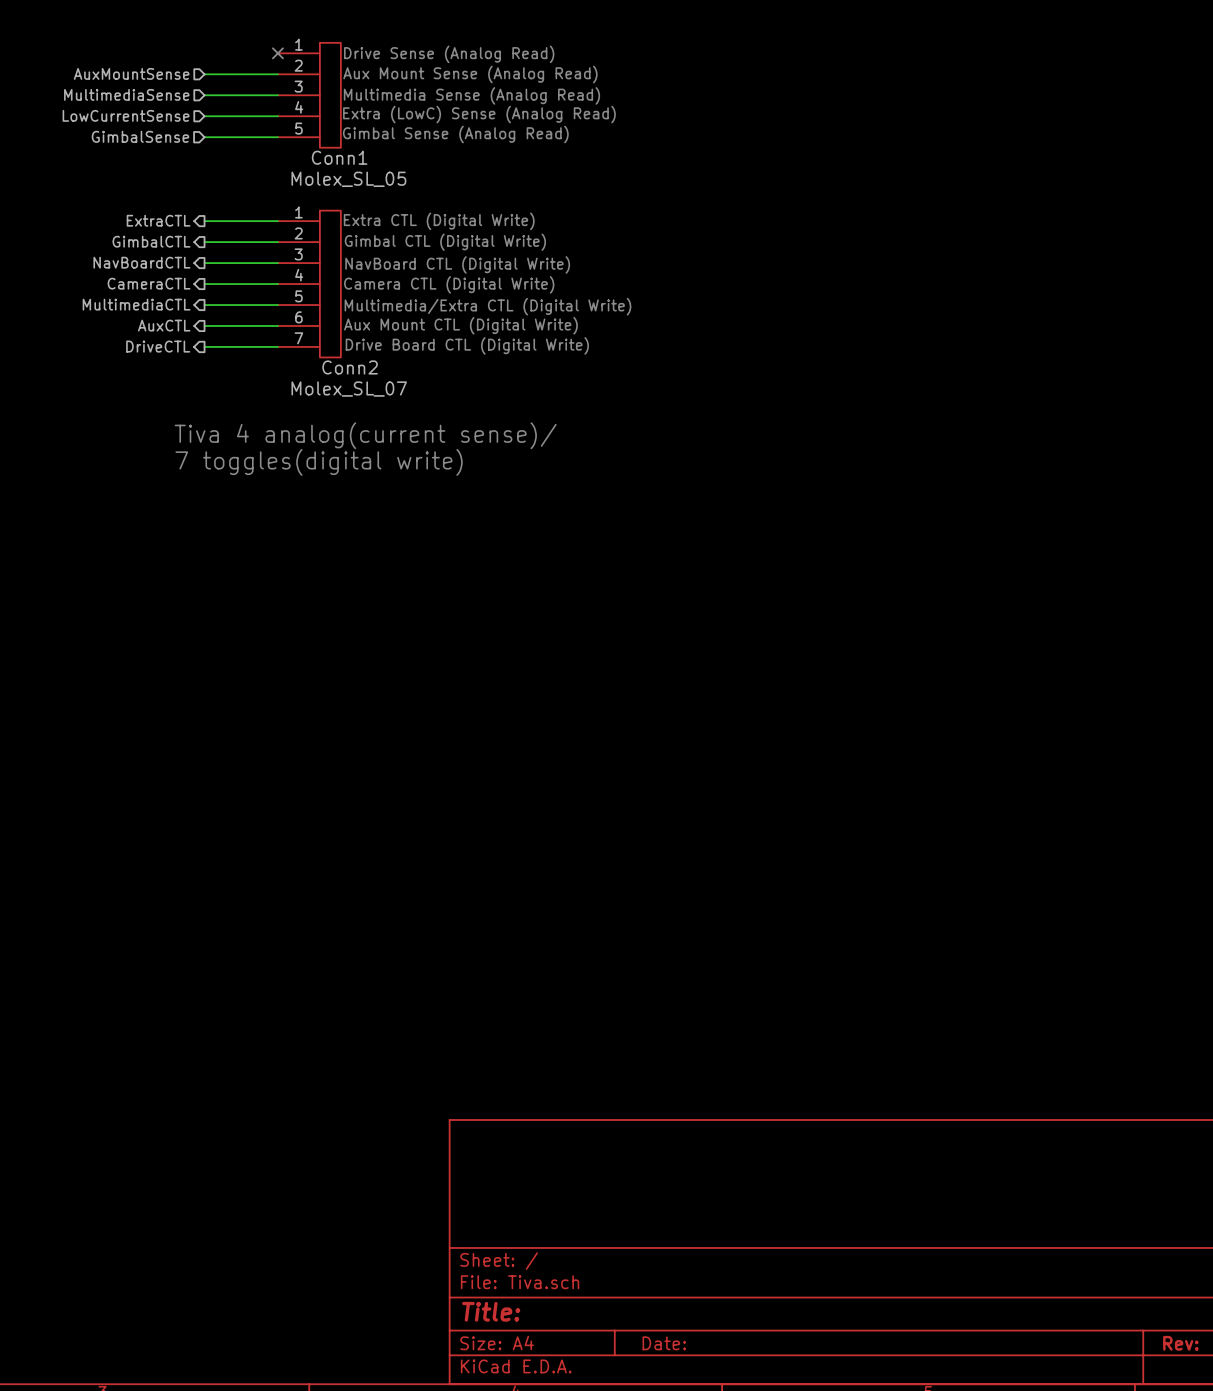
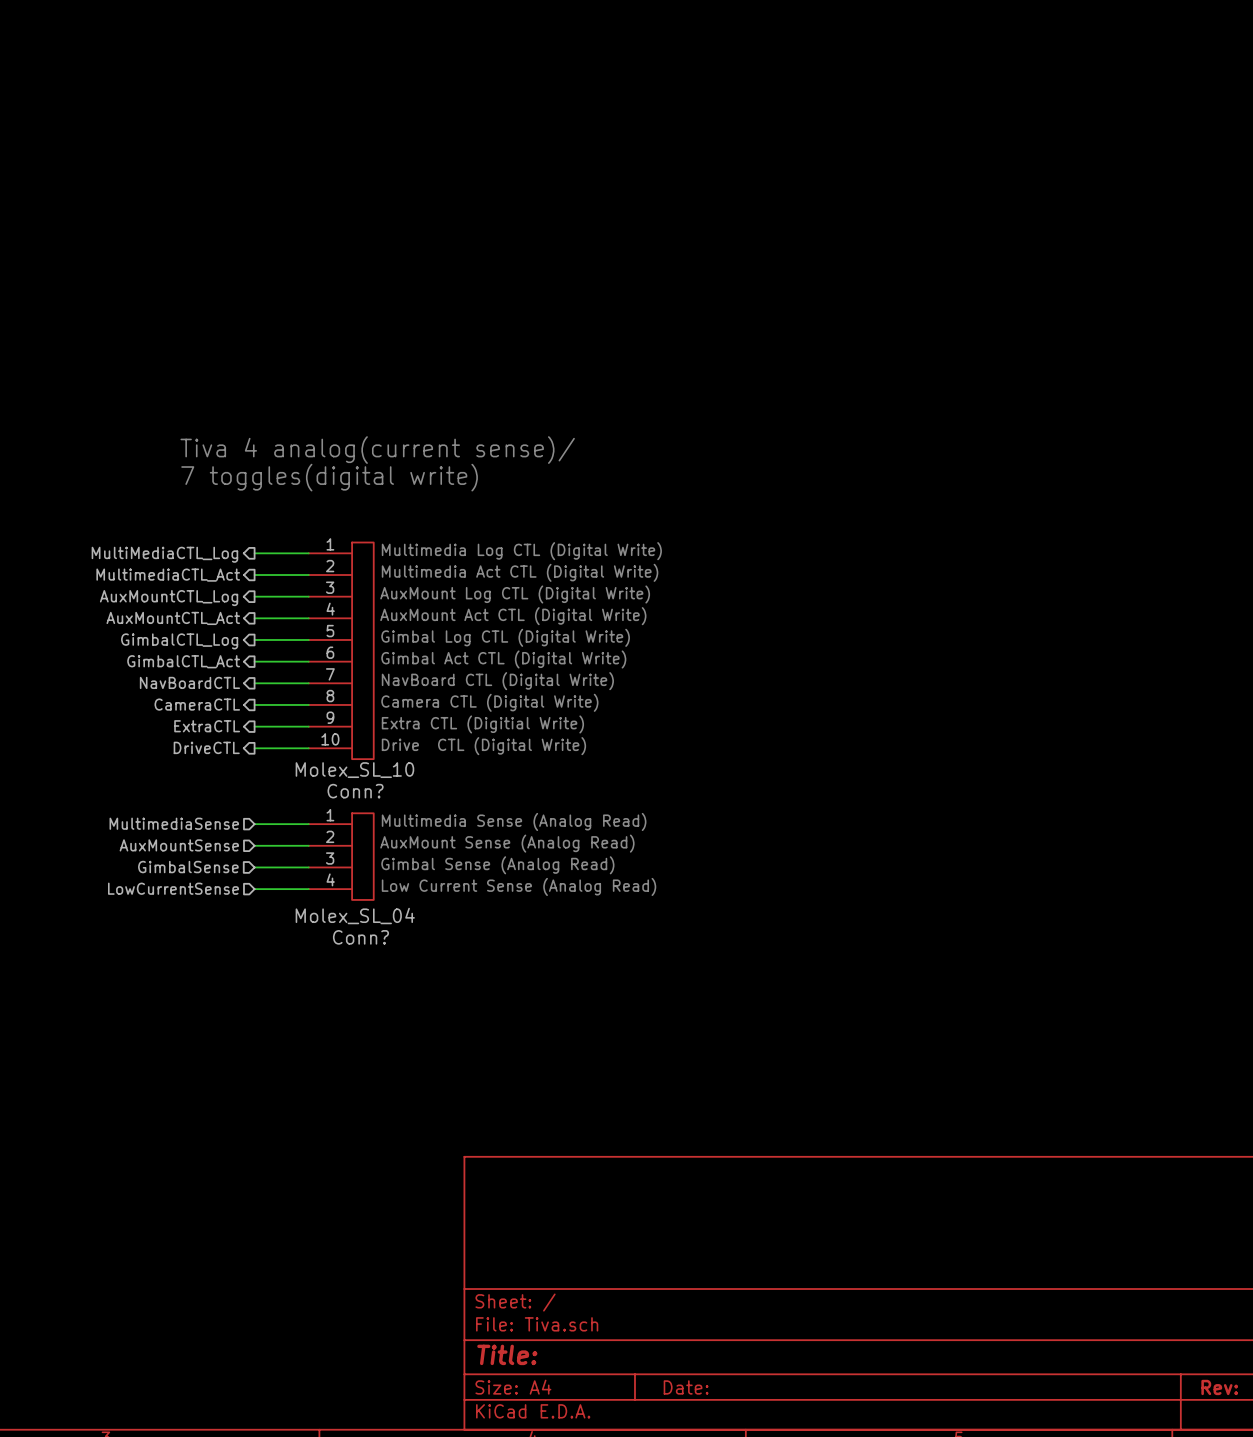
no-connect mark: (277, 53) -> none
text: Drive Sense (Analog Read) (449, 54) -> none
hierarchical label: AuxMountSense (131, 73) -> none
wire: (204, 74) (277, 74) -> none
text: Aux Mount Sense (Analog Read) (470, 74) -> none
hierarchical label: MultimediaSense (126, 94) -> none
wire: (204, 95) (277, 95) -> none
Conn1: Molex_SL_05 (309, 95) -> none
text: Multimedia Sense (Analog Read) (471, 95) -> none
text: Extra (LowC) Sense (Analog Read) (479, 114) -> none
hierarchical label: LowCurrentSense (126, 115) -> none
wire: (204, 116) (277, 116) -> none
text: Gimbal Sense (Analog Read) (455, 134) -> none
hierarchical label: GimbalSense (140, 136) -> none
wire: (204, 137) (277, 137) -> none
hierarchical label: ExtraCTL (158, 220) -> none
wire: (204, 221) (277, 221) -> none
text: Extra CTL (Digital Write) (439, 221) -> none
hierarchical label: GimbalCTL (151, 241) -> none
wire: (204, 242) (277, 242) -> none
text: Gimbal CTL (Digital Write) (445, 242) -> none
hierarchical label: NavBoardCTL (141, 262) -> none
wire: (204, 263) (277, 263) -> none
text: NavBoard CTL (Digital Write) (457, 264) -> none
hierarchical label: CameraCTL (149, 283) -> none
wire: (204, 284) (277, 284) -> none
Conn2: Molex_SL_07 (309, 284) -> none
text: Camera CTL (Digital Write) (449, 284) -> none
hierarchical label: MultimediaCTL (136, 304) -> none
wire: (204, 305) (277, 305) -> none
text: Multimedia/Extra CTL (Digital Write) (487, 306) -> none
hierarchical label: AuxCTL (164, 325) -> none
wire: (204, 325) (277, 325) -> none
text: Aux Mount CTL (Digital Write) (460, 325) -> none
text: Drive Board CTL (Digital Write) (467, 345) -> none
hierarchical label: DriveCTL (158, 346) -> none
wire: (204, 346) (277, 346) -> none
text: none -> Multimedia Log CTL (Digital Write) (521, 551)
wire: none -> (254, 553) (308, 553)
hierarchical label: none -> MultiMediaCTL_Log (164, 554)
text: none -> Multimedia Act CTL (Digital Write) (520, 572)
hierarchical label: none -> MultimediaCTL_Act (168, 575)
wire: none -> (254, 575) (308, 575)
text: none -> AuxMount Log CTL (Digital Write) (515, 594)
wire: none -> (254, 596) (308, 596)
hierarchical label: none -> AuxMountCTL_Log (169, 598)
text: none -> AuxMount Act CTL (Digital Write) (513, 616)
hierarchical label: none -> AuxMountCTL_Act (173, 618)
wire: none -> (254, 618) (308, 618)
text: none -> Gimbal Log CTL (Digital Write) (505, 637)
wire: none -> (254, 639) (308, 639)
hierarchical label: none -> GimbalCTL_Log (179, 641)
Conn?: none -> Molex_SL_10 (341, 650)
text: none -> Gimbal Act CTL (Digital Write) (503, 659)
hierarchical label: none -> GimbalCTL_Act (183, 661)
wire: none -> (254, 661) (308, 661)
text: none -> NavBoard CTL (Digital Write) (497, 681)
hierarchical label: none -> NavBoardCTL (189, 682)
wire: none -> (254, 683) (308, 683)
text: none -> Camera CTL (Digital Write) (489, 702)
hierarchical label: none -> CameraCTL (197, 704)
wire: none -> (254, 704) (308, 704)
text: none -> Extra CTL (Digitial Write) (482, 724)
hierarchical label: none -> ExtraCTL (207, 726)
wire: none -> (254, 726) (308, 726)
text: none -> Drive CTL (Digital Write) (483, 746)
hierarchical label: none -> DriveCTL (206, 747)
wire: none -> (254, 748) (308, 748)
text: none -> Multimedia Sense (Analog Read) (514, 821)
hierarchical label: none -> MultimediaSense (174, 823)
wire: none -> (254, 824) (308, 824)
text: none -> AuxMount Sense (Analog Read) (507, 843)
hierarchical label: none -> AuxMountSense (179, 845)
wire: none -> (254, 845) (308, 845)
Conn?: none -> Molex_SL_04 (341, 856)
text: none -> Gimbal Sense (Analog Read) (497, 865)
hierarchical label: none -> GimbalSense (188, 867)
wire: none -> (254, 867) (308, 867)
text: none -> Low Current Sense (Analog Read) (519, 886)
hierarchical label: none -> LowCurrentSense (173, 888)
wire: none -> (254, 889) (308, 889)

